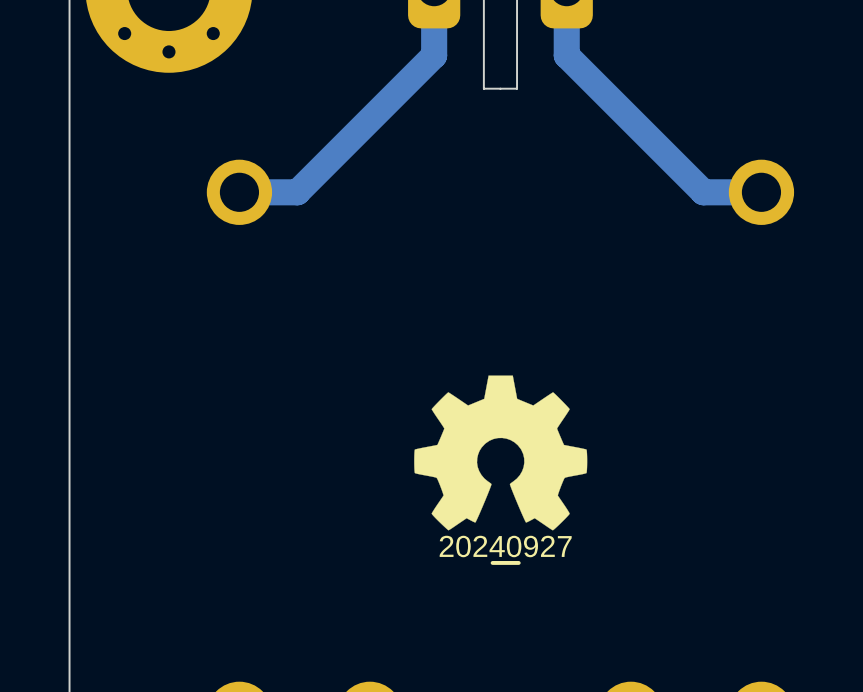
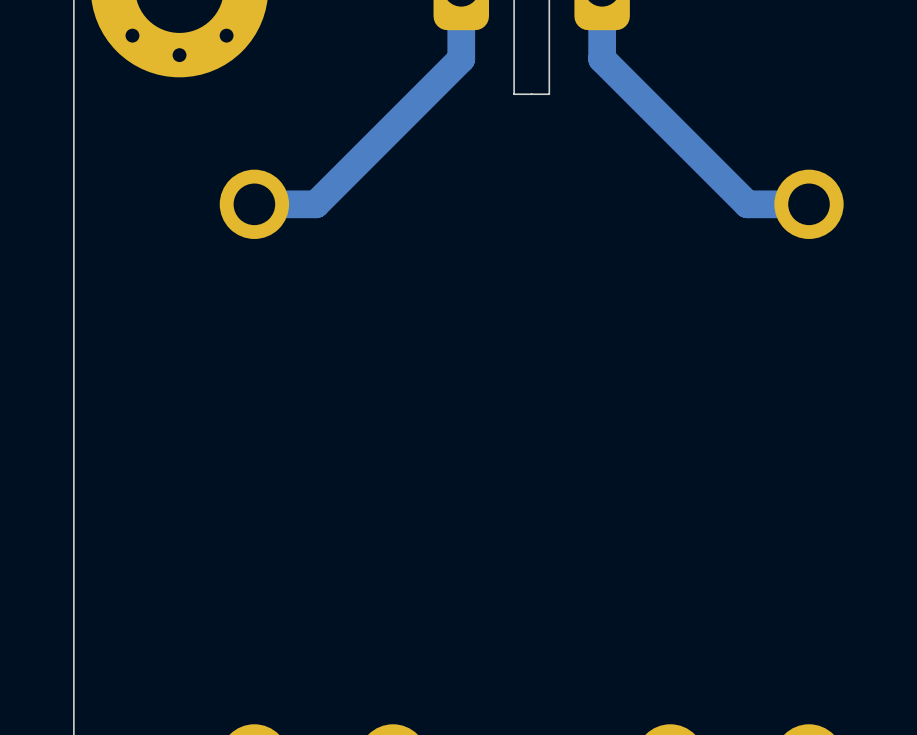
drawing: [414, 375, 588, 565] -> none

